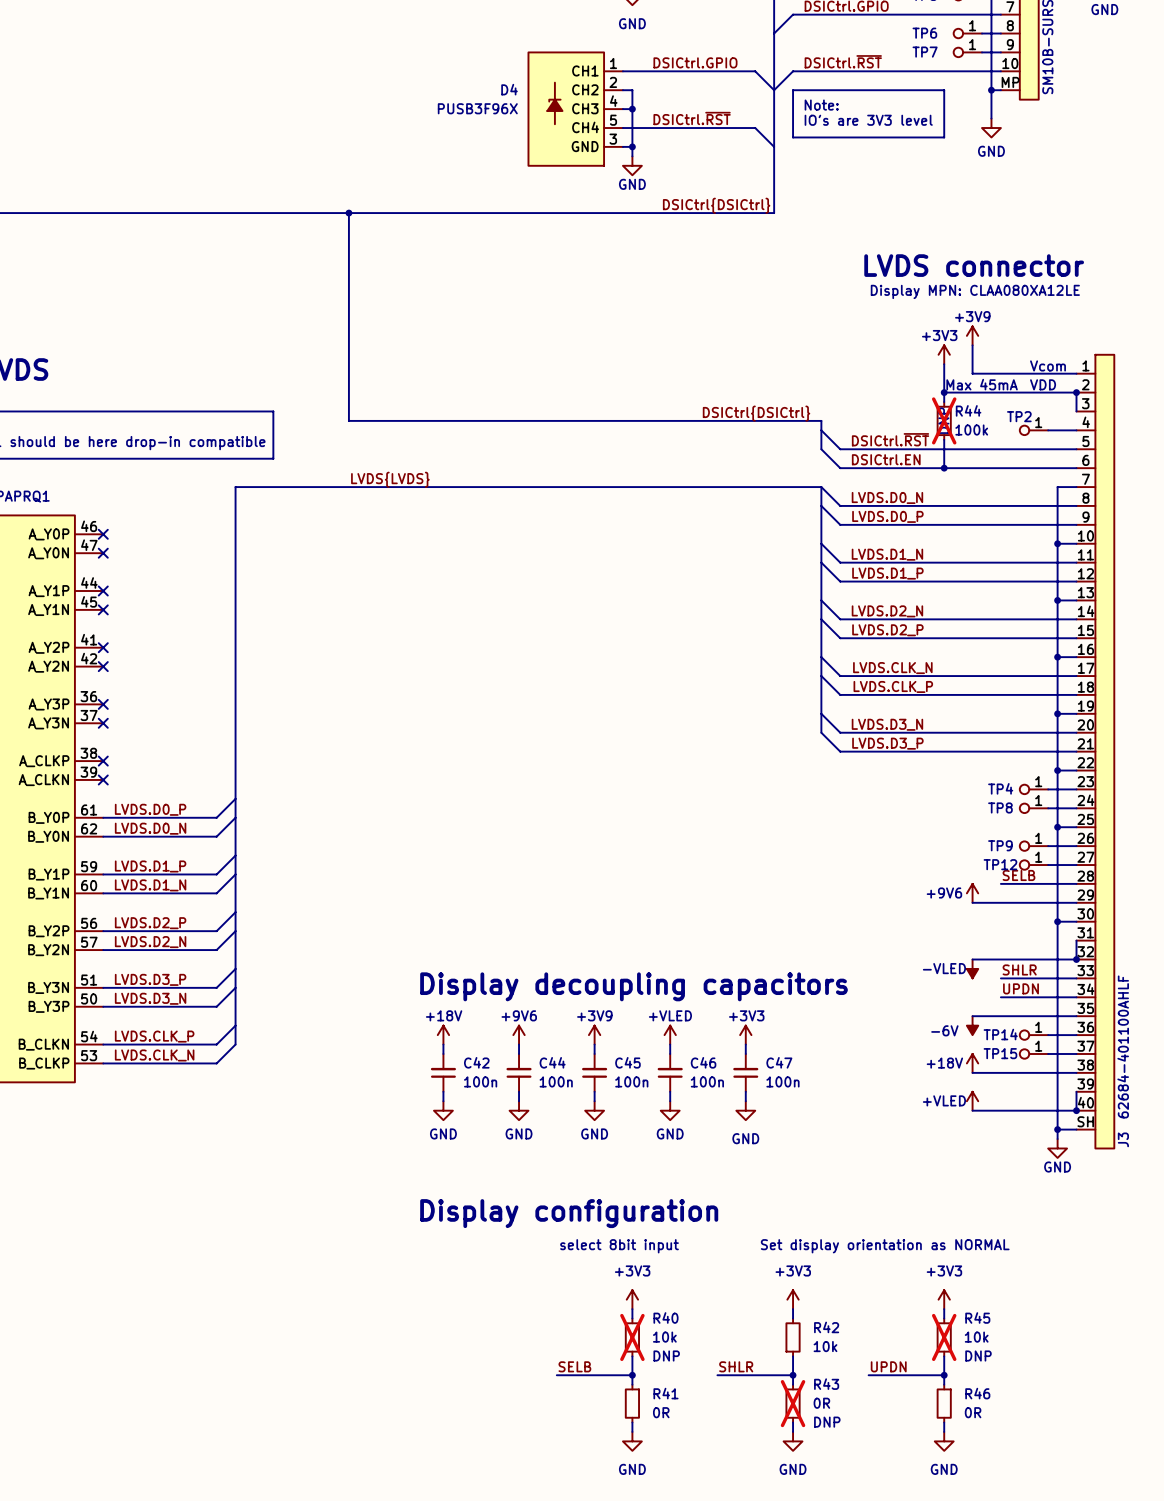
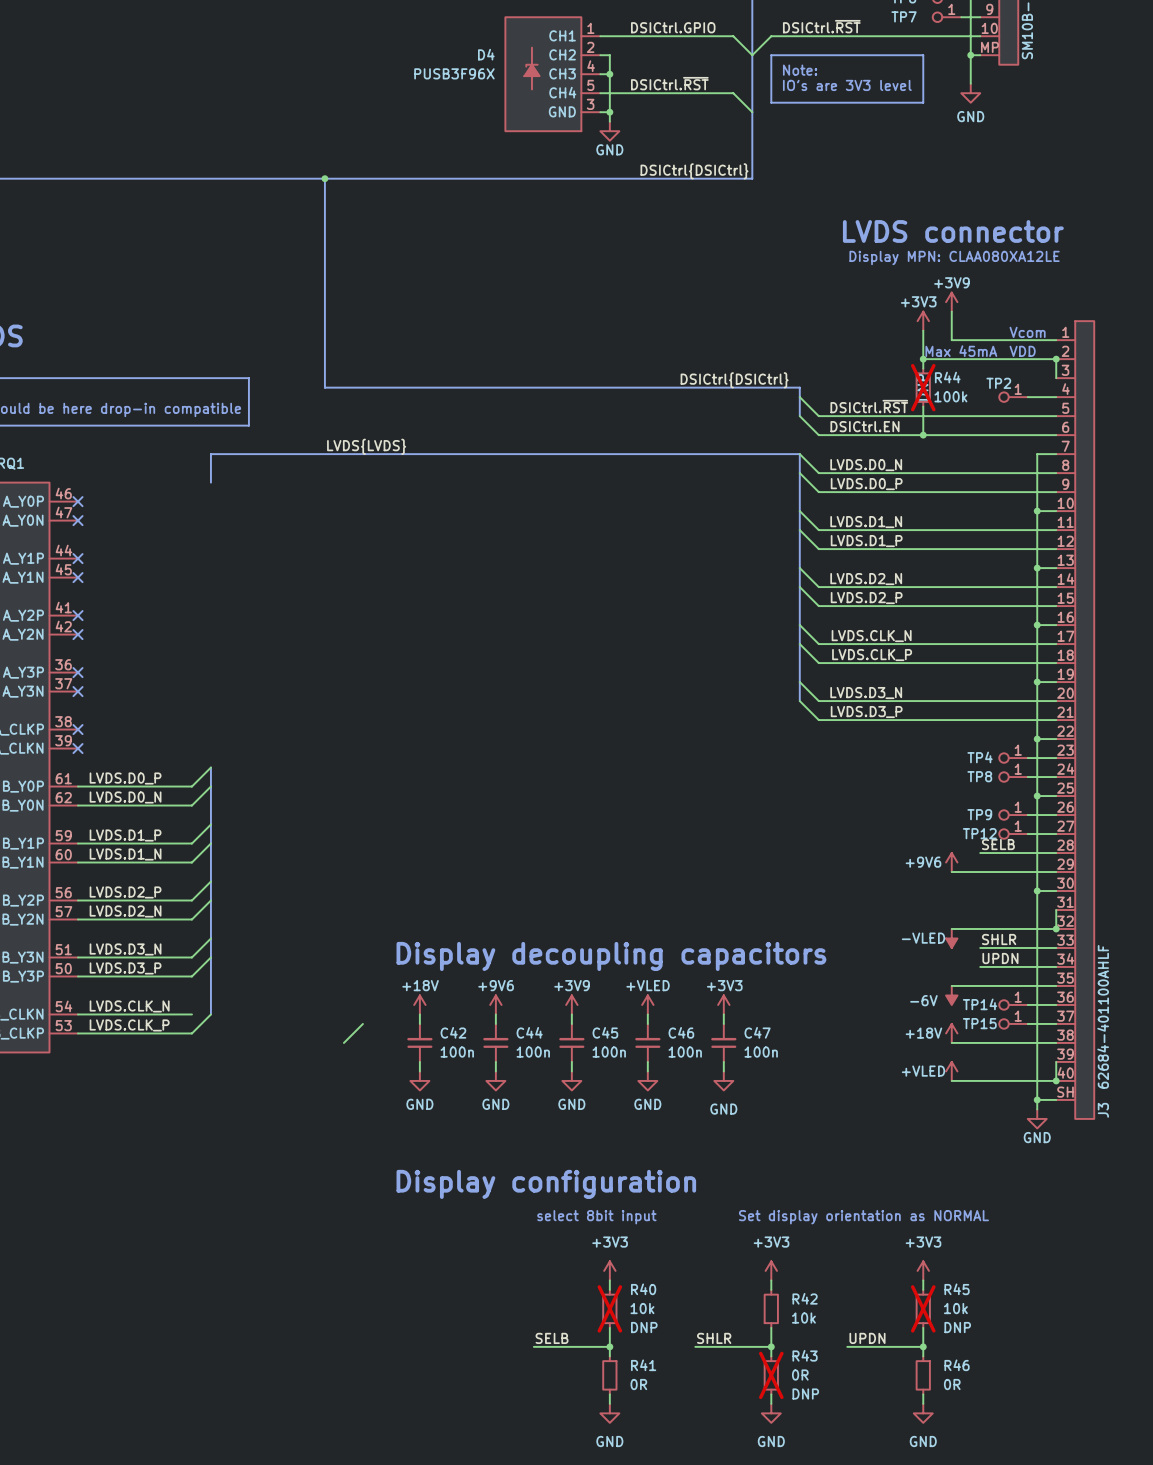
bus: (235, 515) (235, 798) -> none
label: LVDS.D3_P (150, 979) -> LVDS.D3_N (125, 949)
label: LVDS.D3_N (150, 998) -> LVDS.D3_P (125, 968)
wire: (235, 1025) (216, 1044) -> (362, 1023) (343, 1042)
label: LVDS.CLK_P (154, 1036) -> LVDS.CLK_N (129, 1006)
label: LVDS.CLK_N (154, 1055) -> LVDS.CLK_P (129, 1025)

